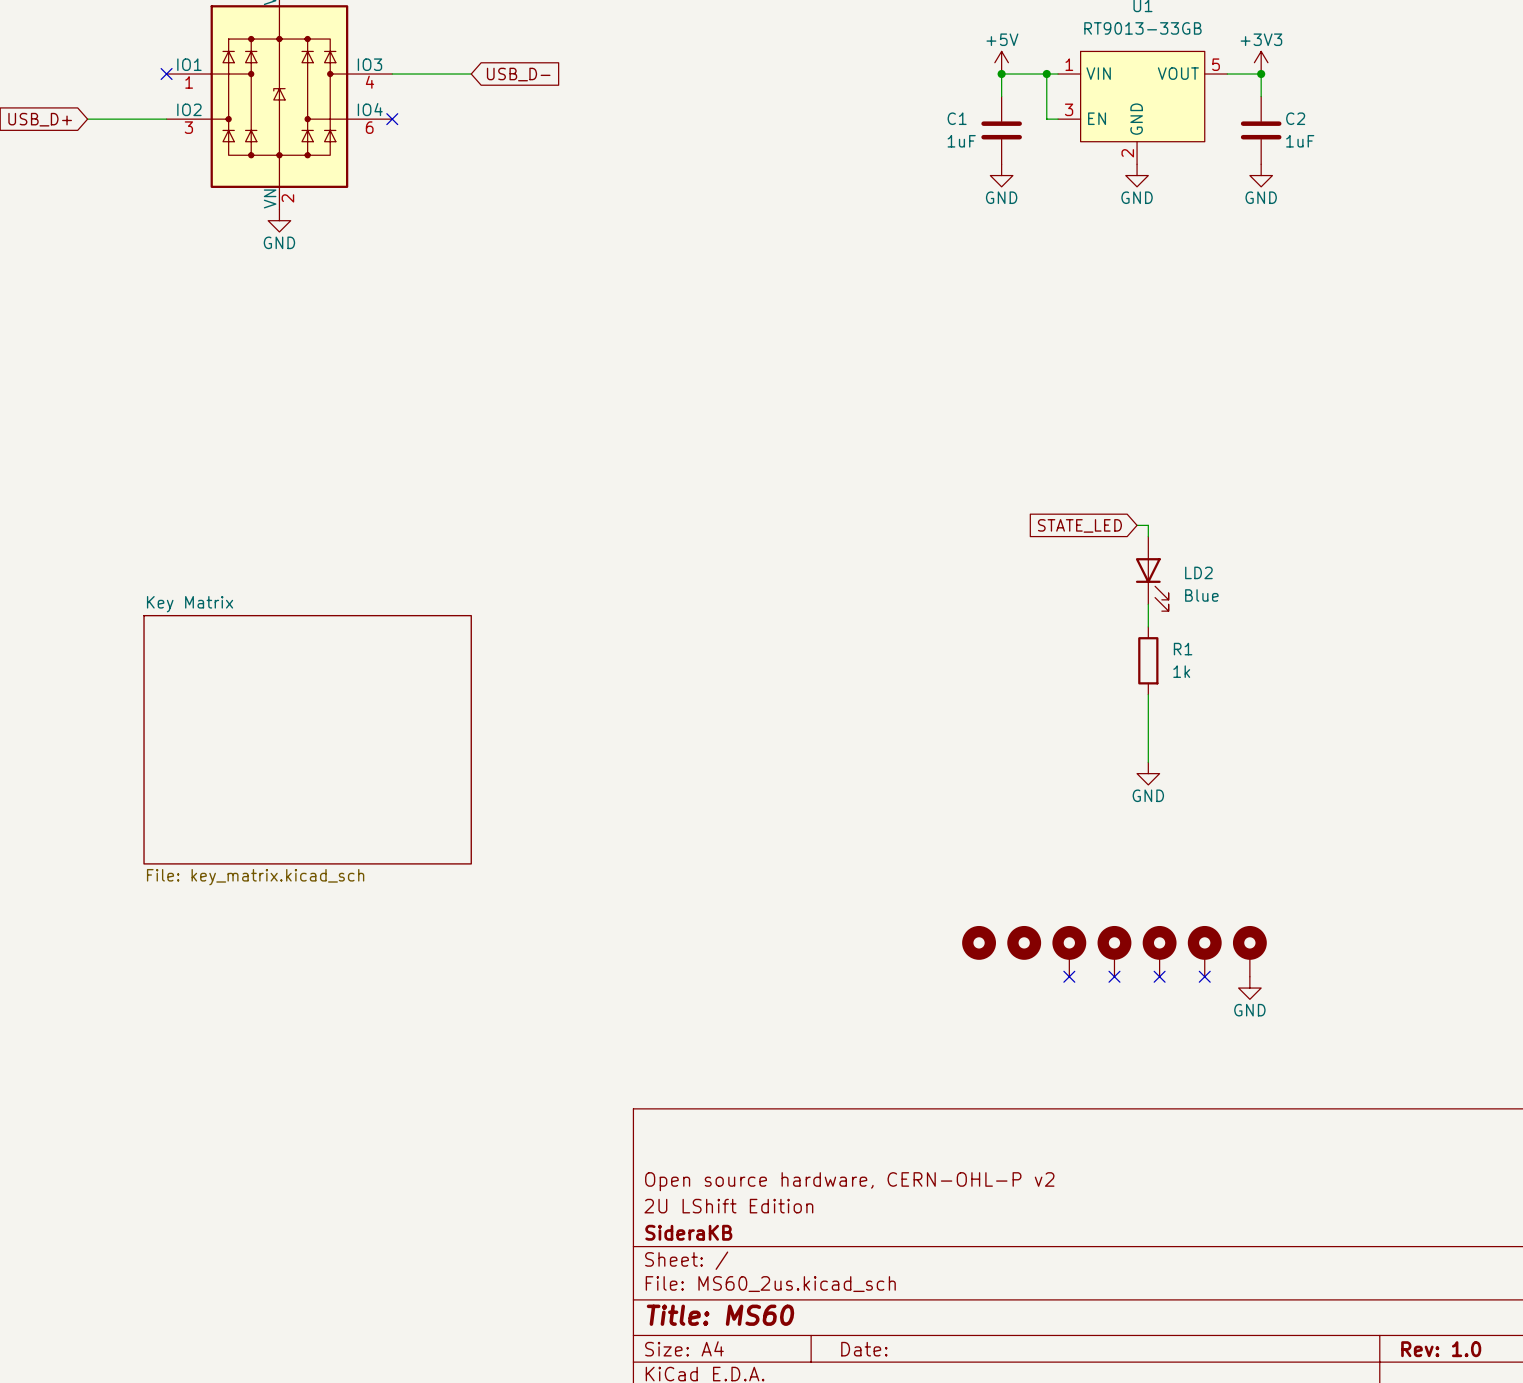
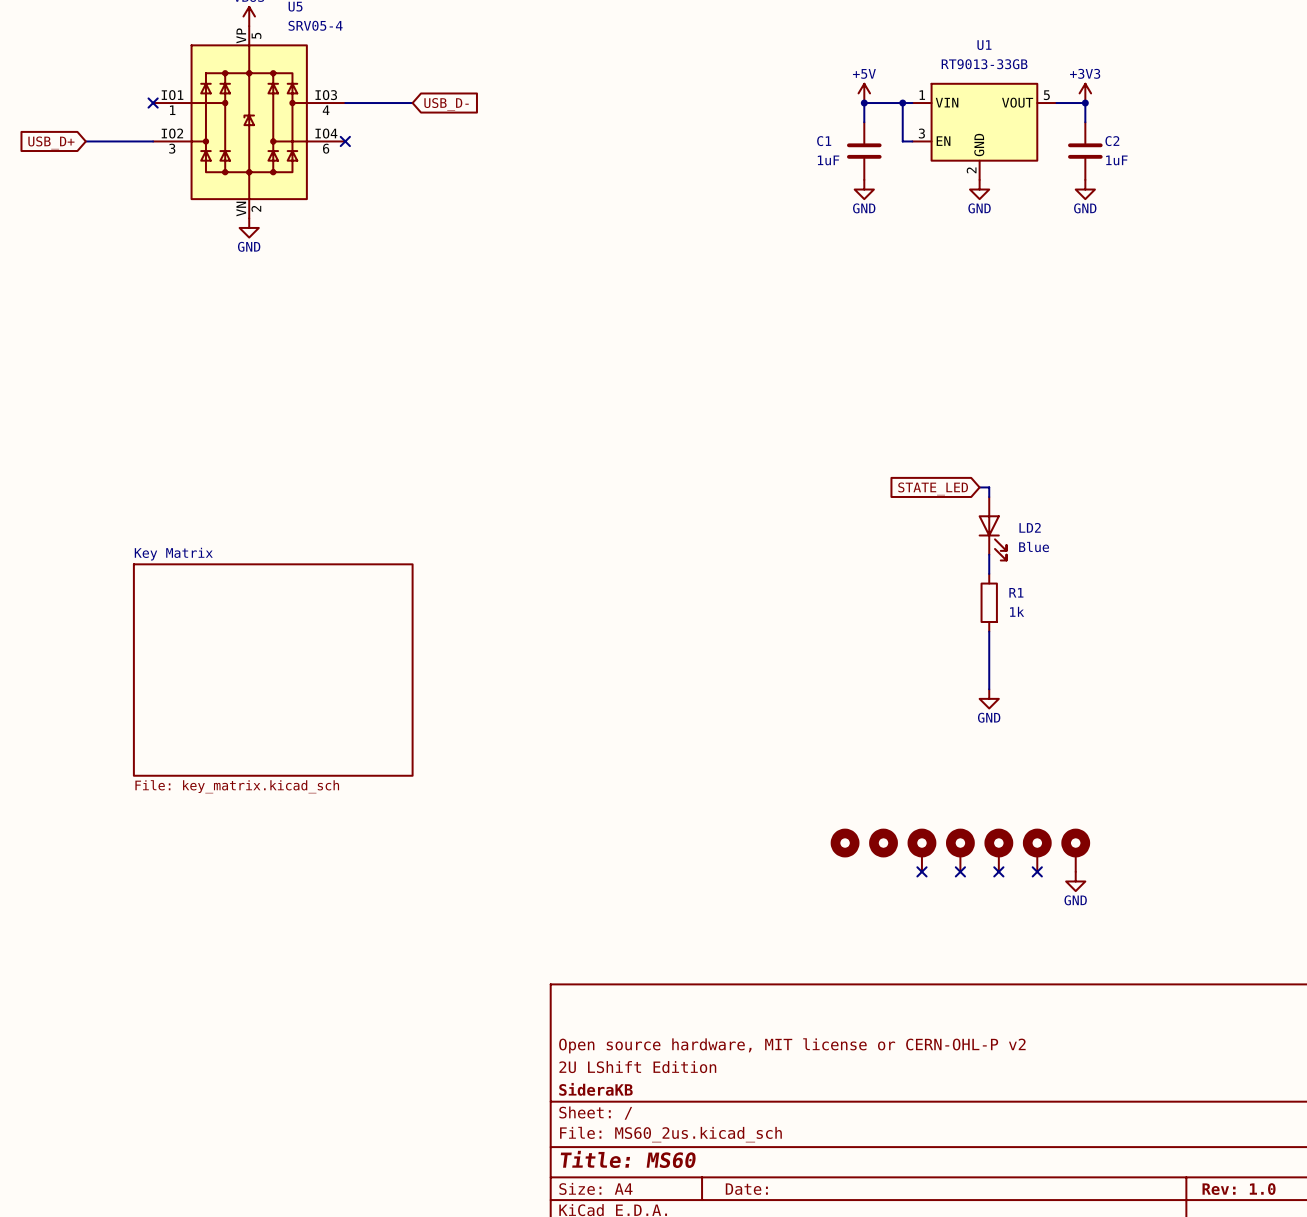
title block: Open source hardware, CERN-OHL-P v2 (849, 1181) -> Open source hardware, MIT license or CERN-OHL-P v2 (792, 1045)

